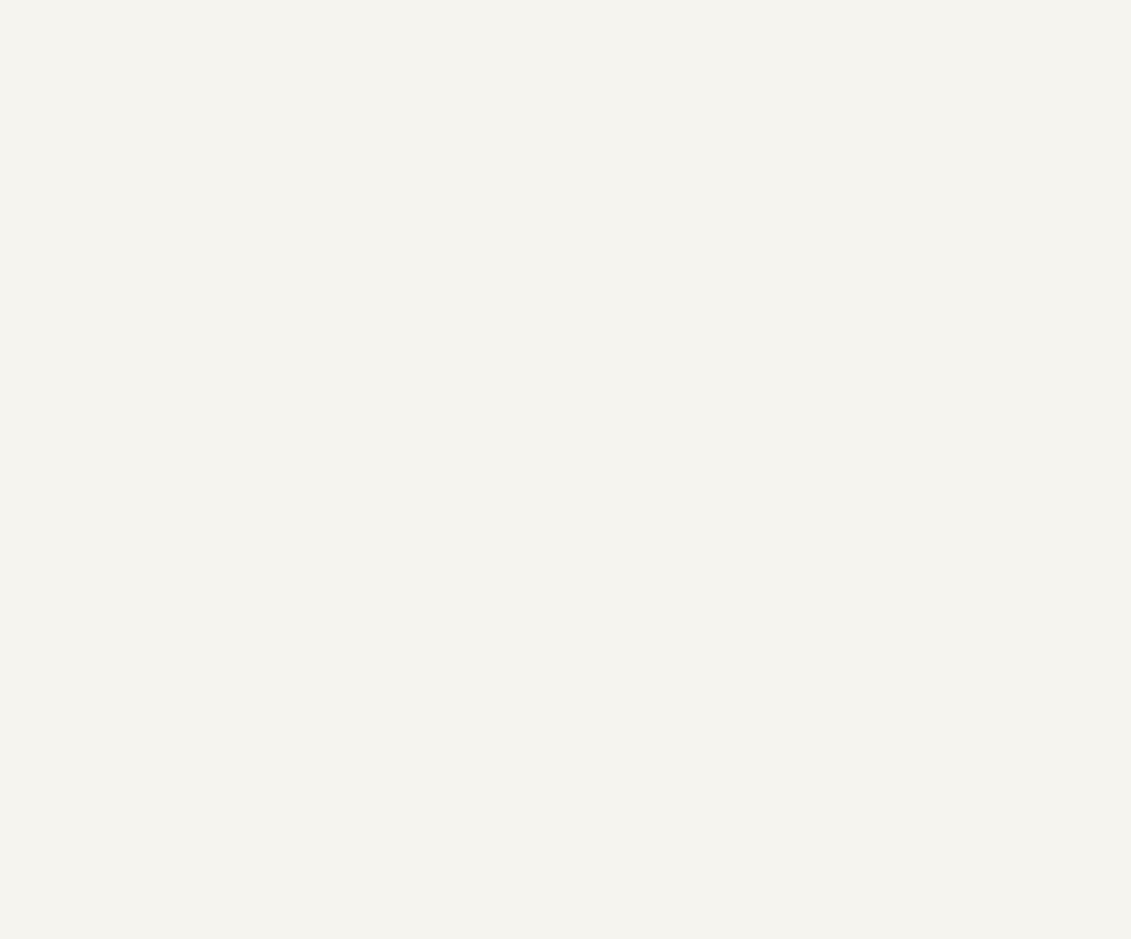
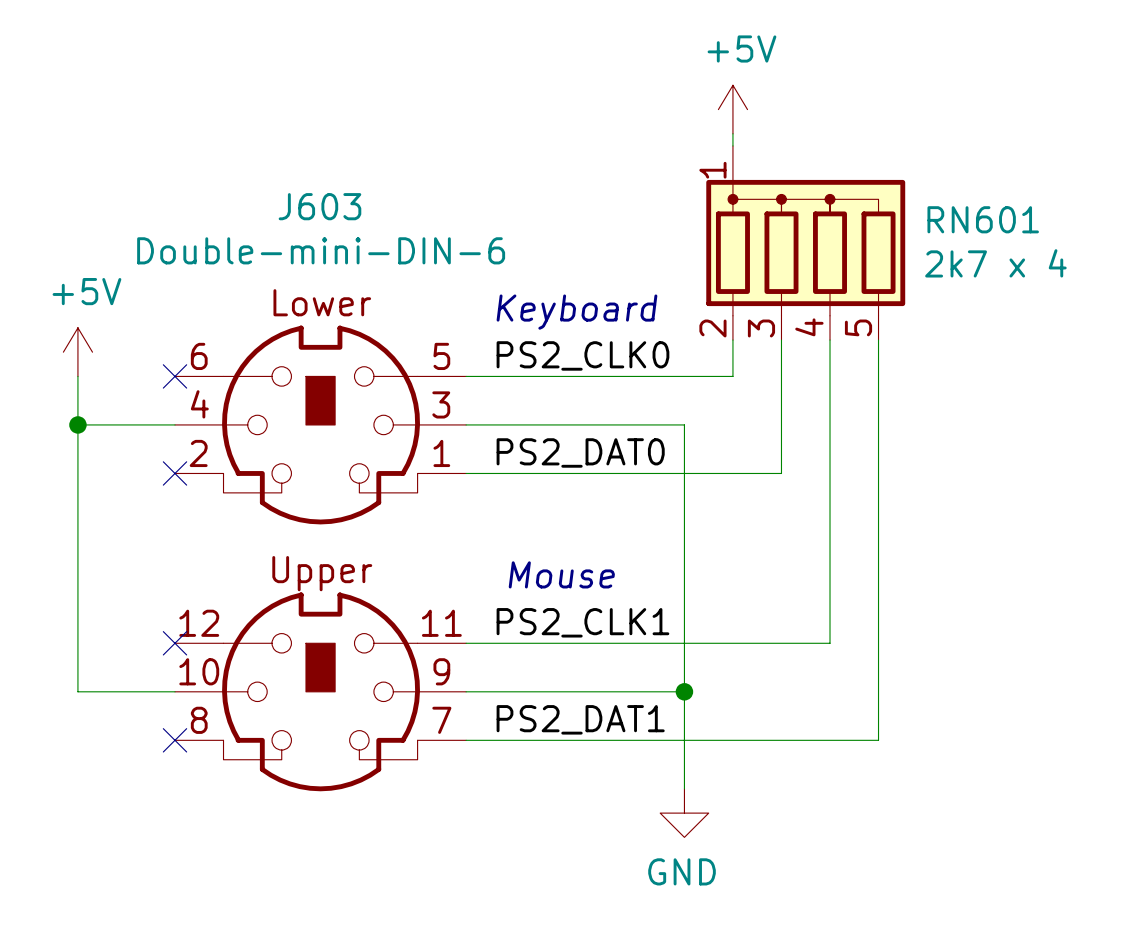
power symbol: none -> +5V (732, 109)
wire: none -> (732, 133) (732, 145)
RN601: none -> 2k7 x 4 (805, 243)
text: none -> Keyboard (576, 312)
wire: none -> (732, 340) (732, 376) (466, 376)
wire: none -> (781, 340) (781, 473) (466, 473)
wire: none -> (830, 340) (830, 643) (466, 643)
wire: none -> (878, 340) (878, 740) (466, 740)
power symbol: none -> +5V (77, 352)
label: none -> PS2_CLK0 (582, 355)
wire: none -> (77, 376) (77, 691) (174, 691)
no-connect mark: none -> (174, 376)
wire: none -> (77, 424) (174, 424)
junction: none -> (77, 424)
wire: none -> (466, 424) (684, 424) (684, 788)
label: none -> PS2_DAT0 (580, 452)
no-connect mark: none -> (174, 473)
J603: none -> Double-mini-DIN-6 (320, 558)
text: none -> Mouse (561, 574)
label: none -> PS2_CLK1 (582, 622)
no-connect mark: none -> (174, 643)
wire: none -> (466, 691) (684, 691)
junction: none -> (684, 691)
label: none -> PS2_DAT1 (580, 719)
no-connect mark: none -> (174, 740)
power symbol: none -> GND (684, 813)

